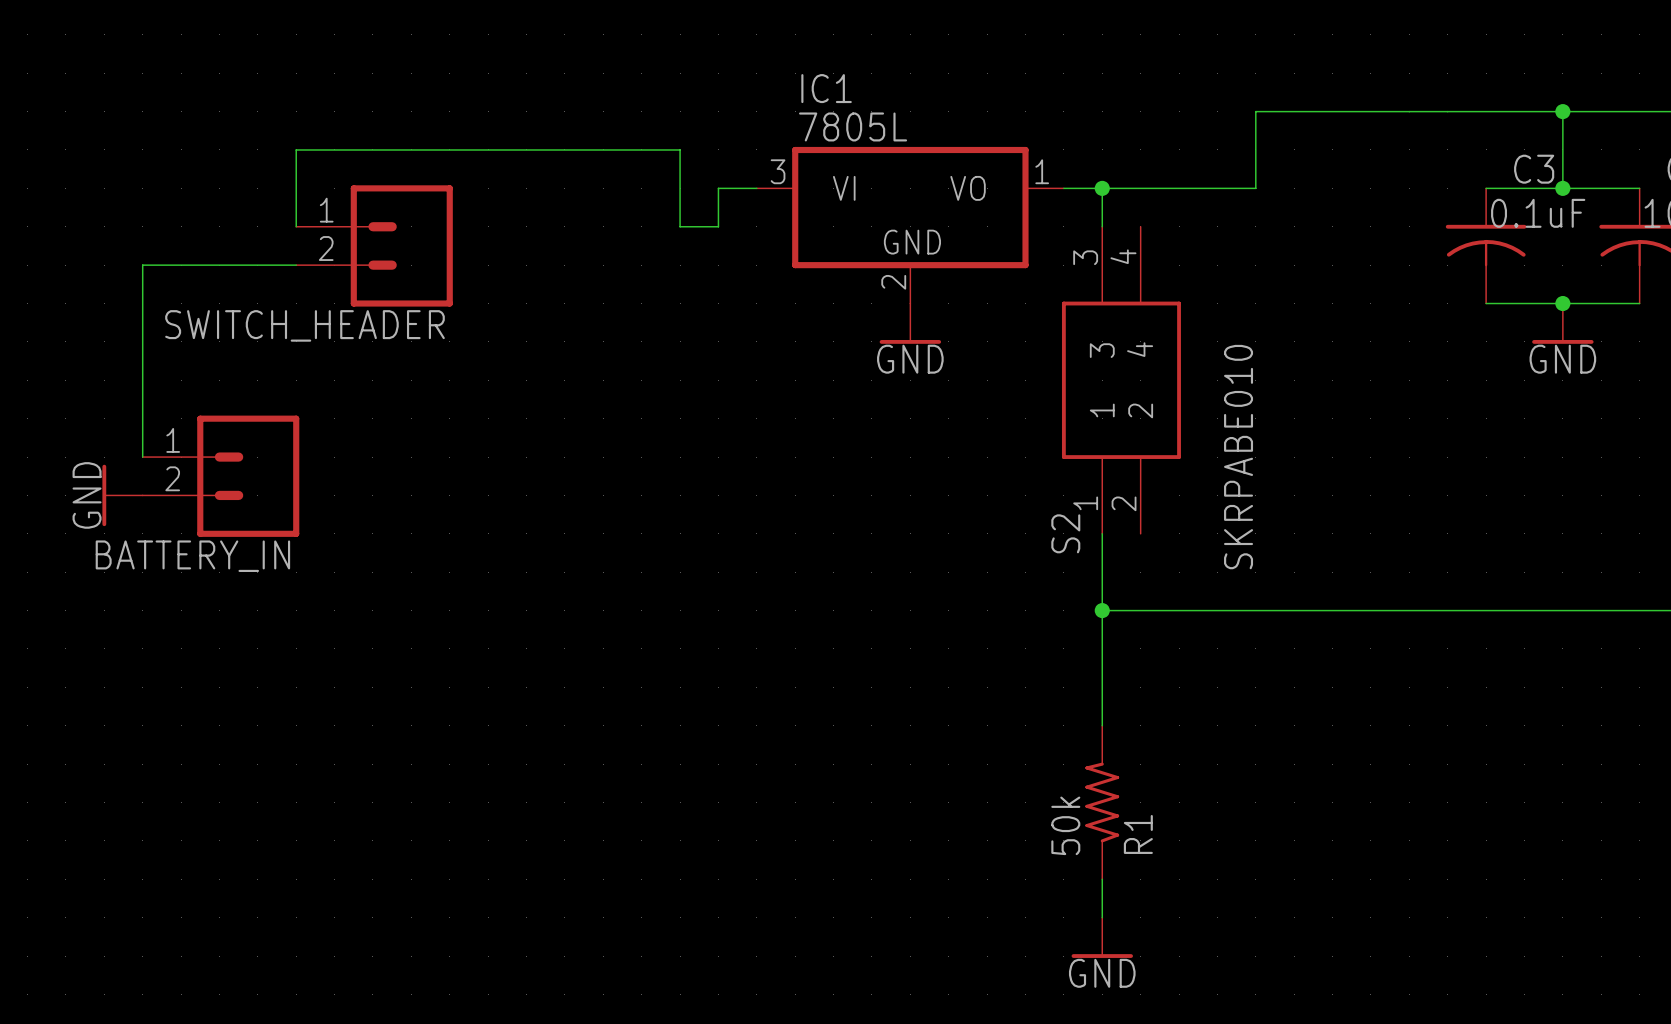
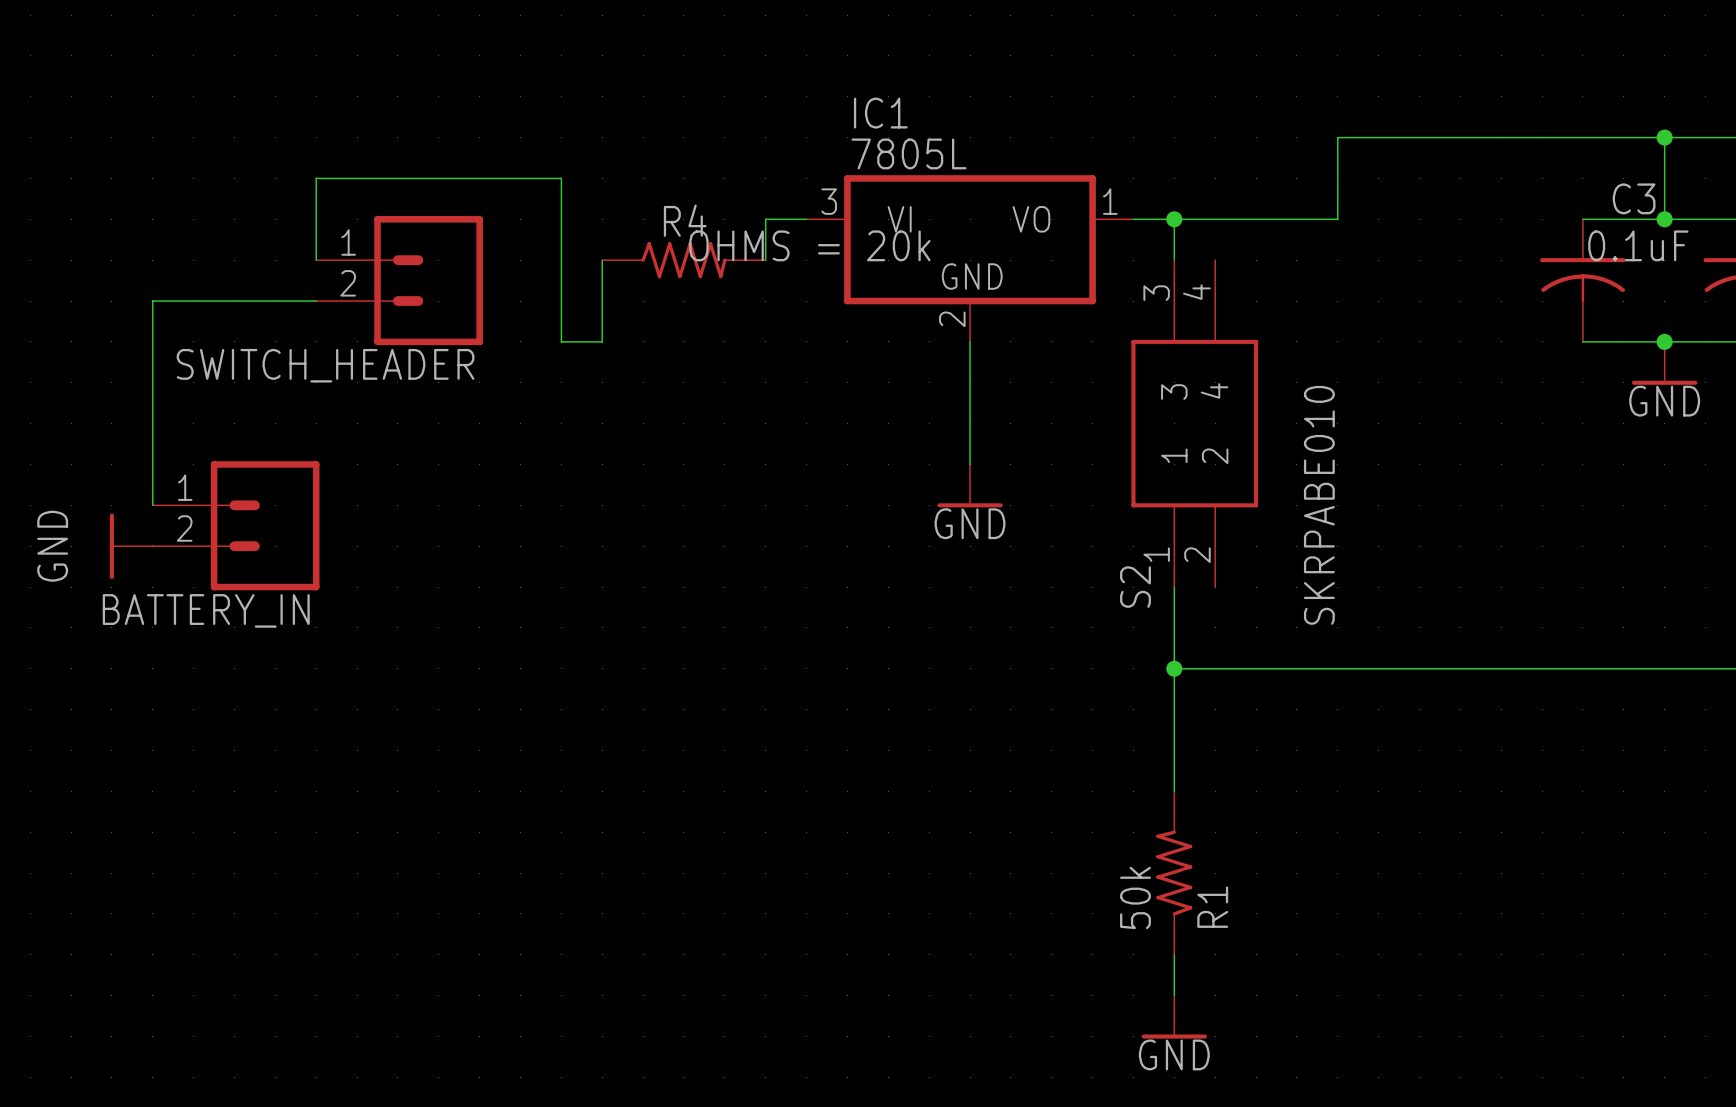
wire: (526, 149) (680, 149) (680, 226) (718, 226) -> (561, 178) (561, 341) (602, 341) (602, 260)
R4: none -> (683, 260)
wire: none -> (970, 341) (970, 464)
power symbol position: GND (910, 323) -> GND (970, 485)
power symbol text position: GND (87, 495) -> GND (52, 546)

